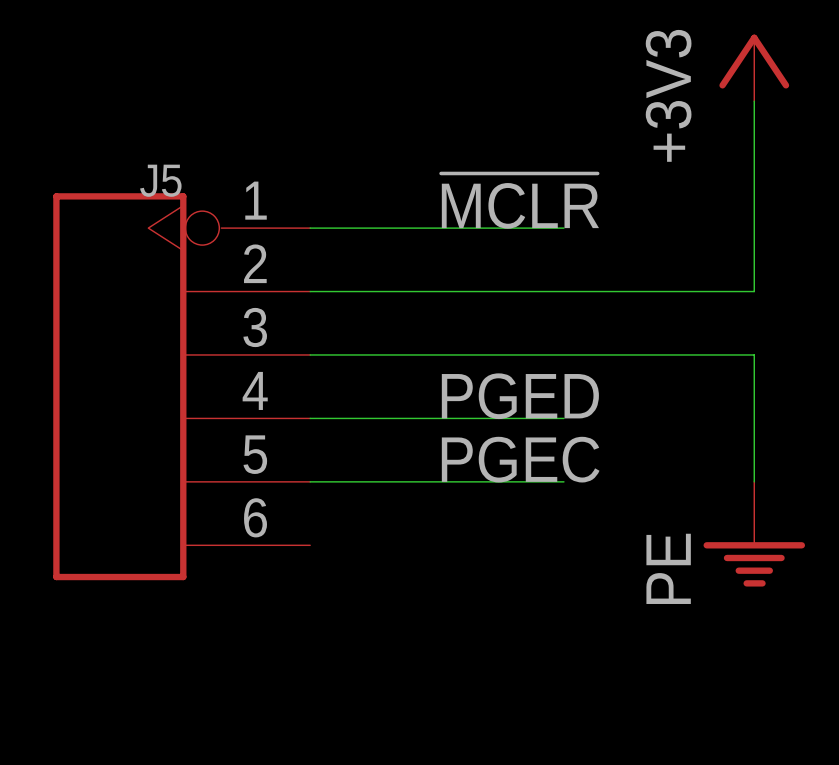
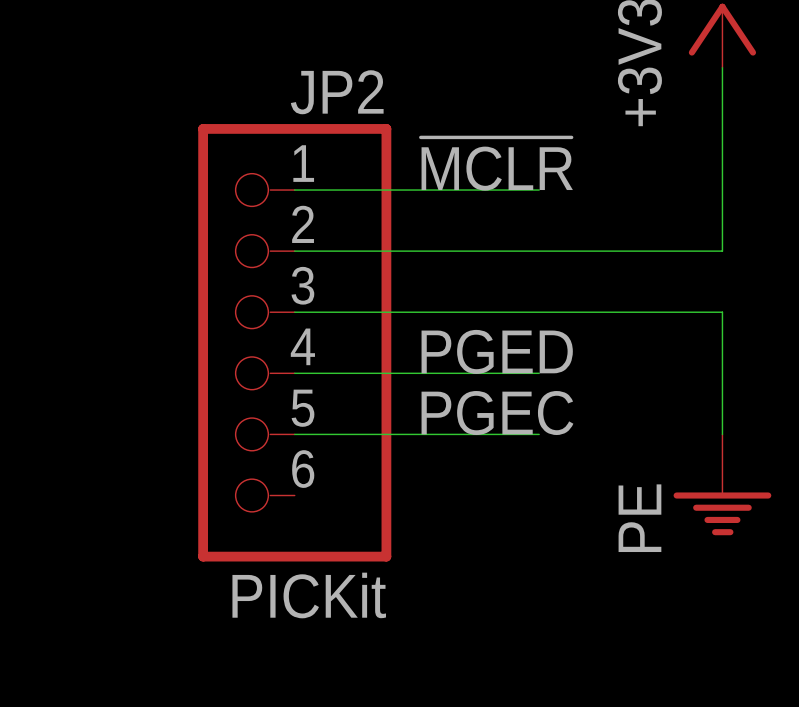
J5: (181, 386) -> none
JP2: none -> PICKit (294, 342)

